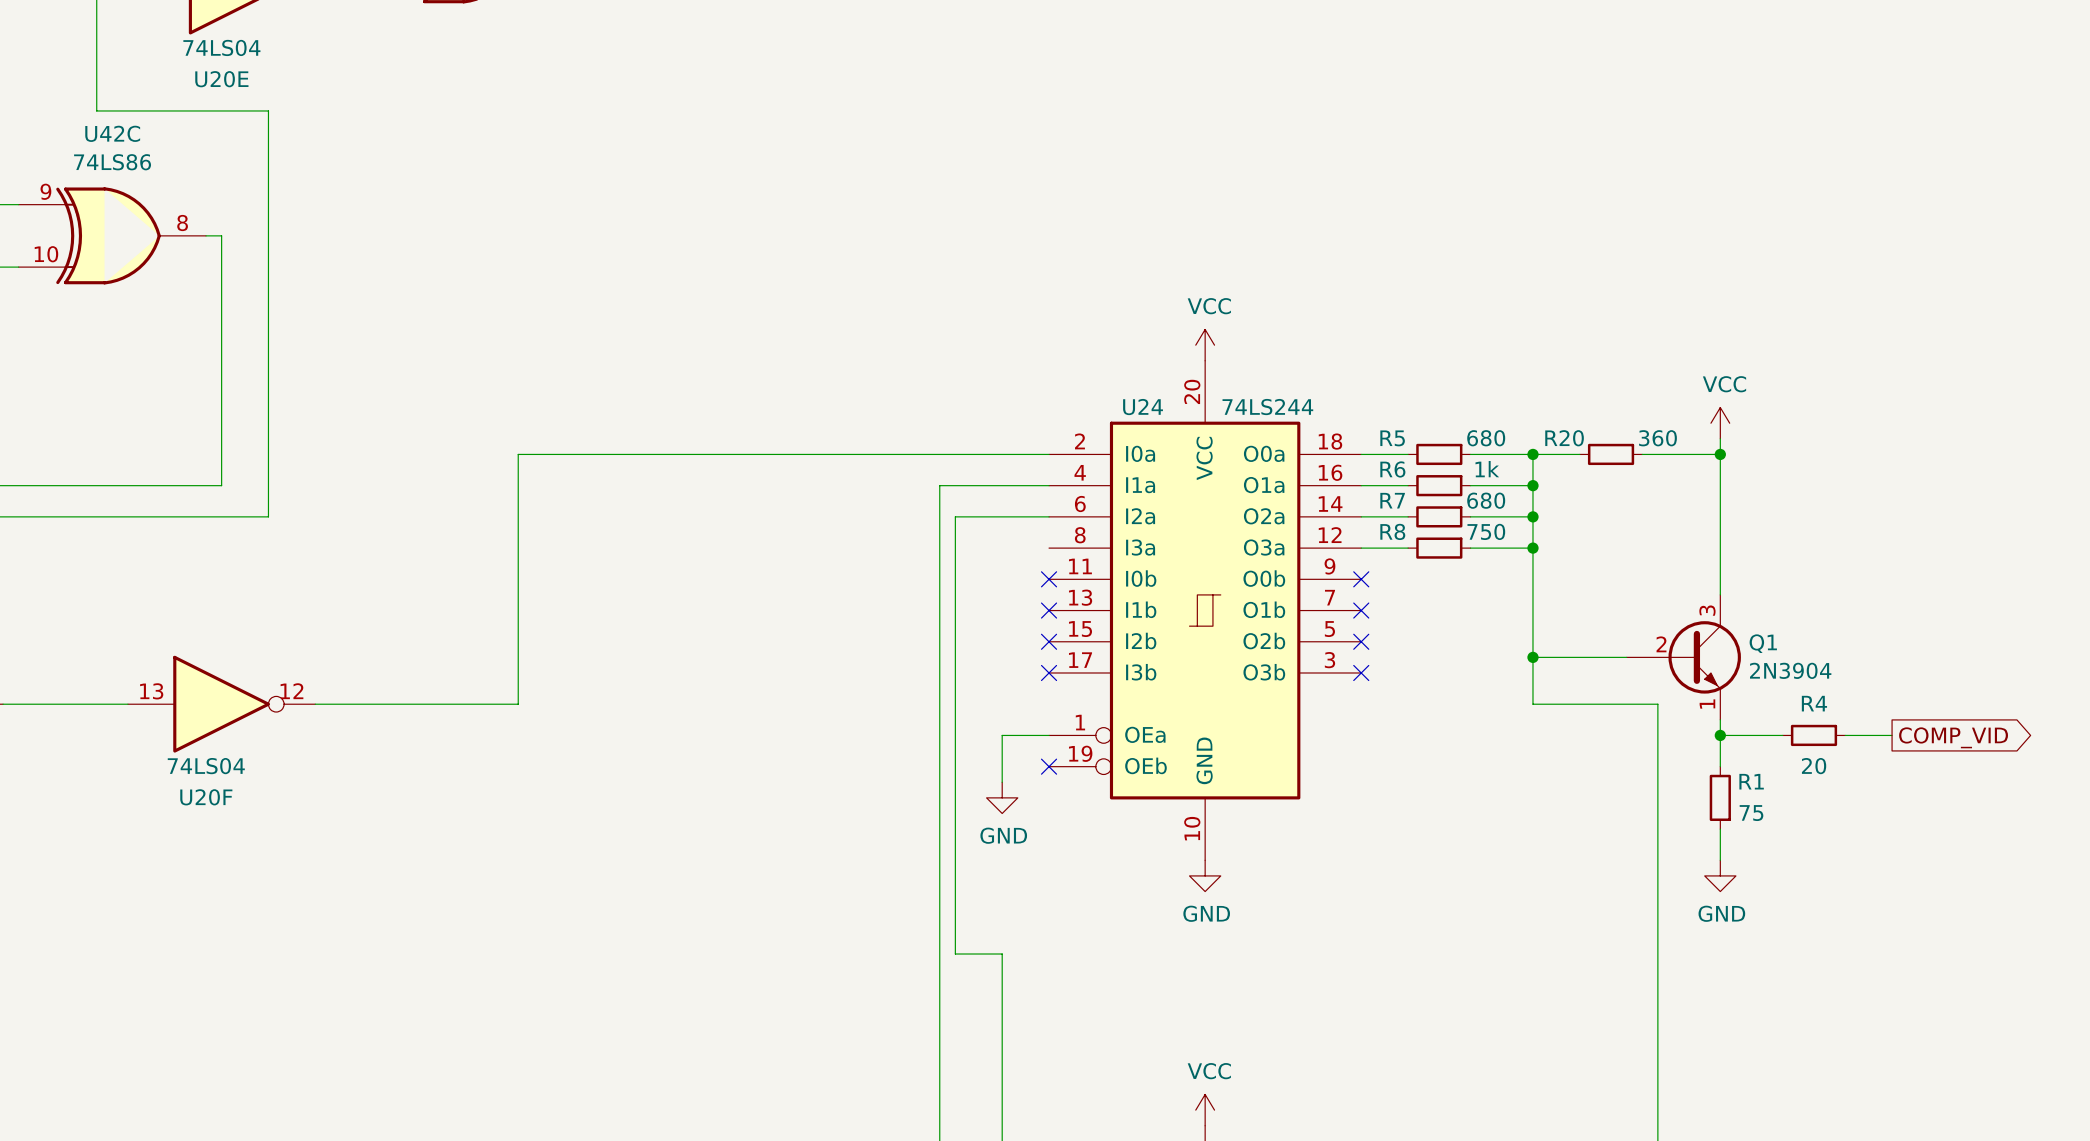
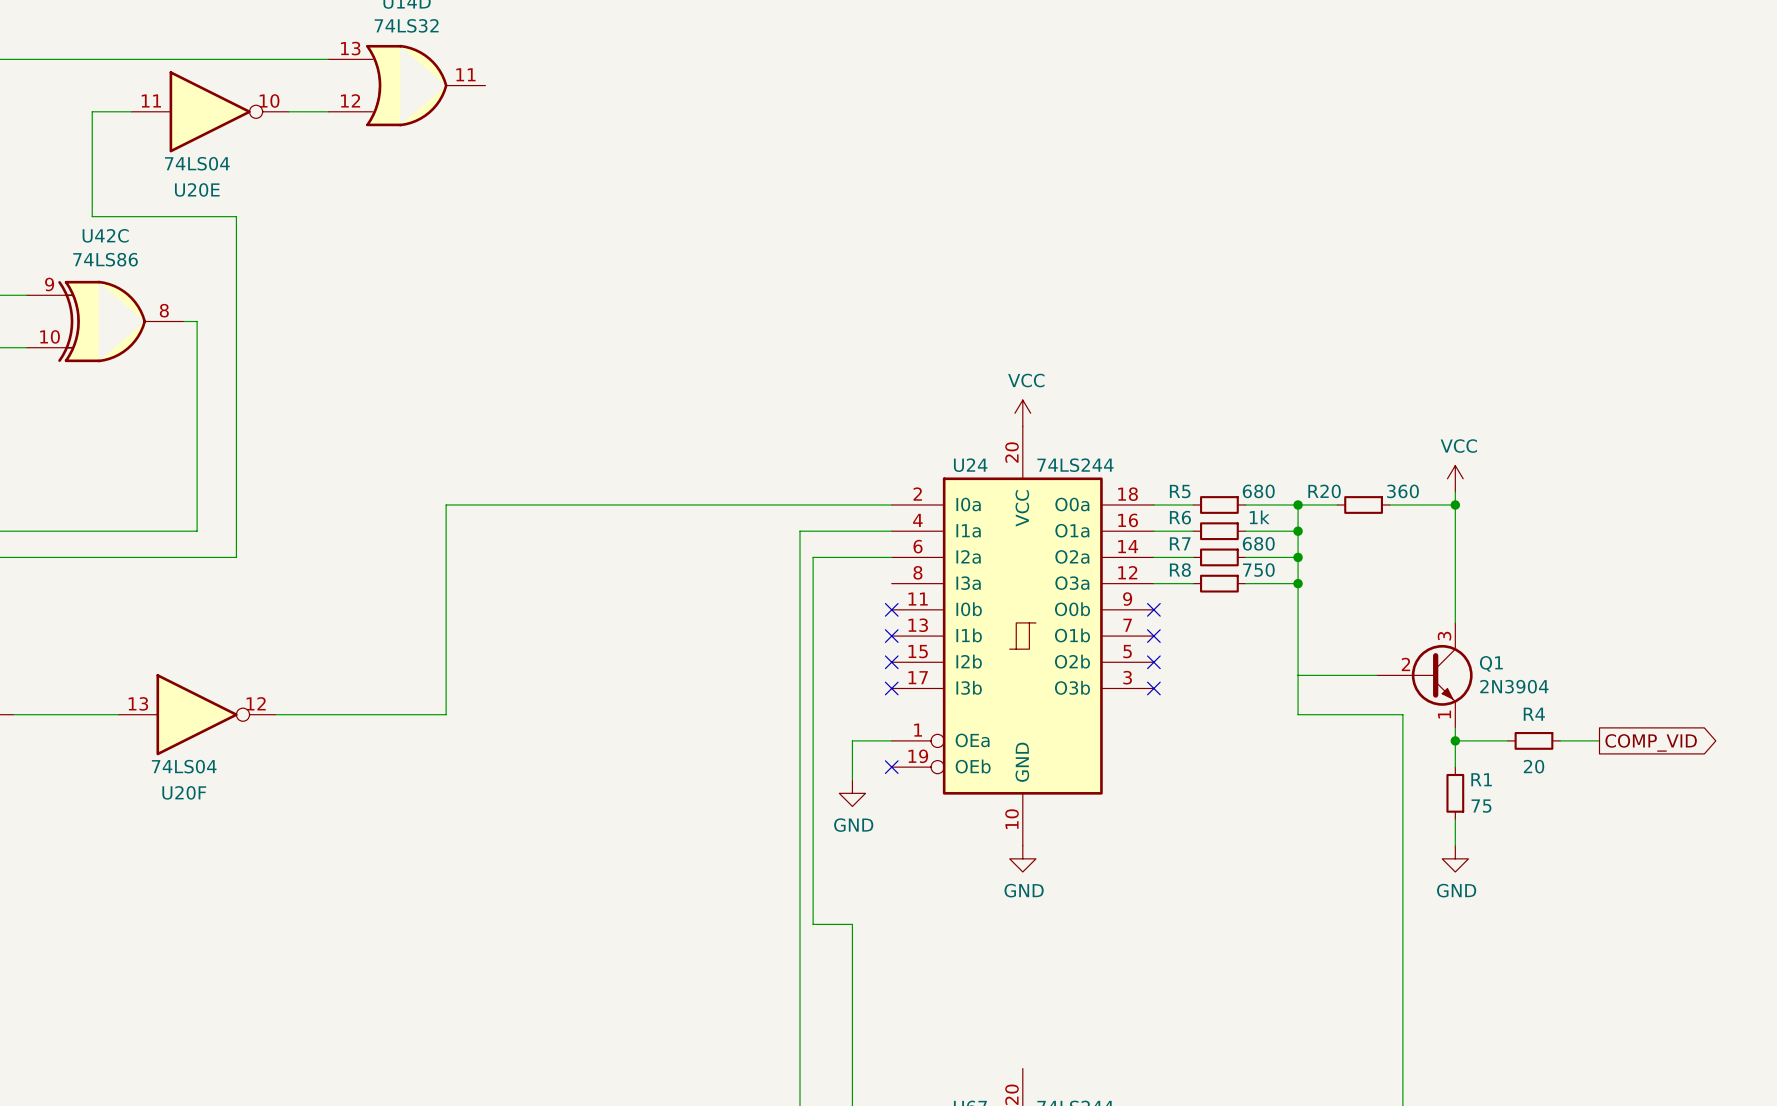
junction: (1532, 657) -> none
power symbol: VCC (1205, 1110) -> none

